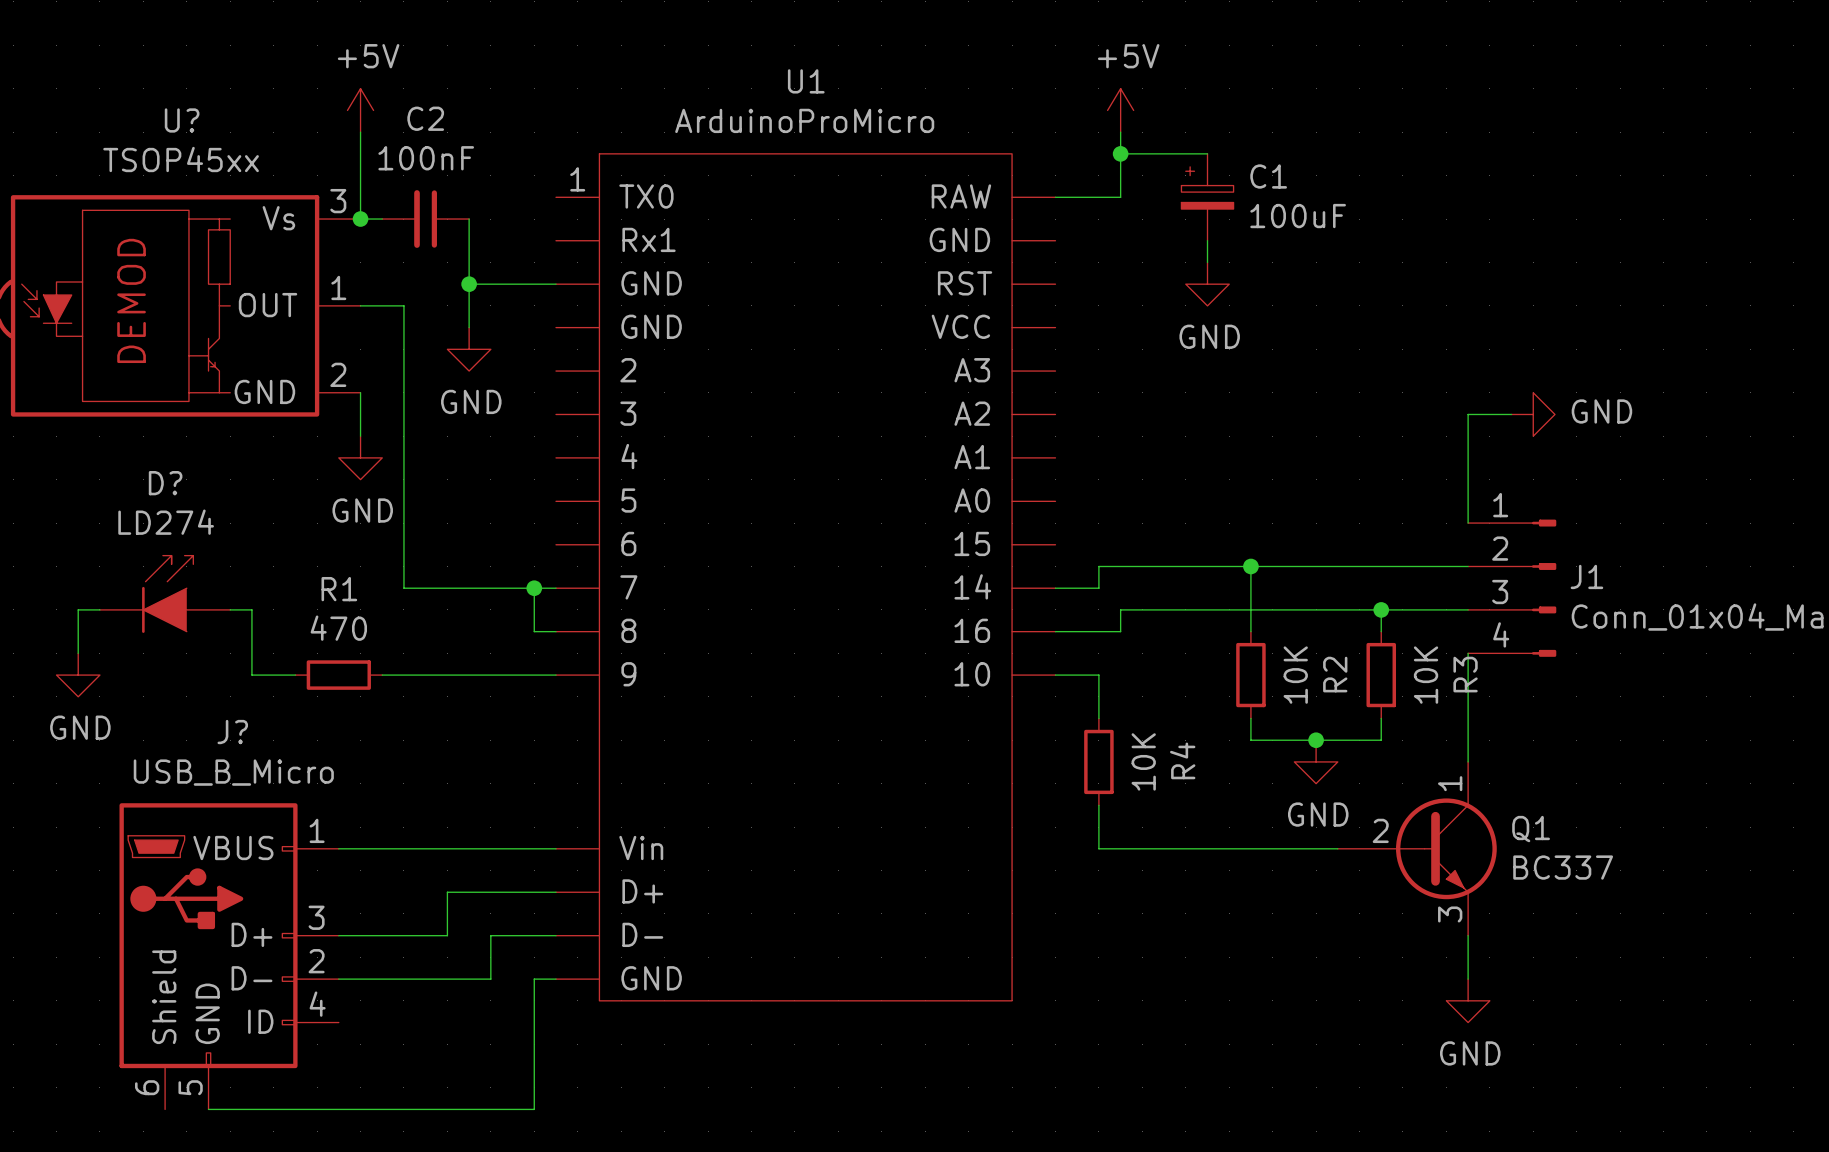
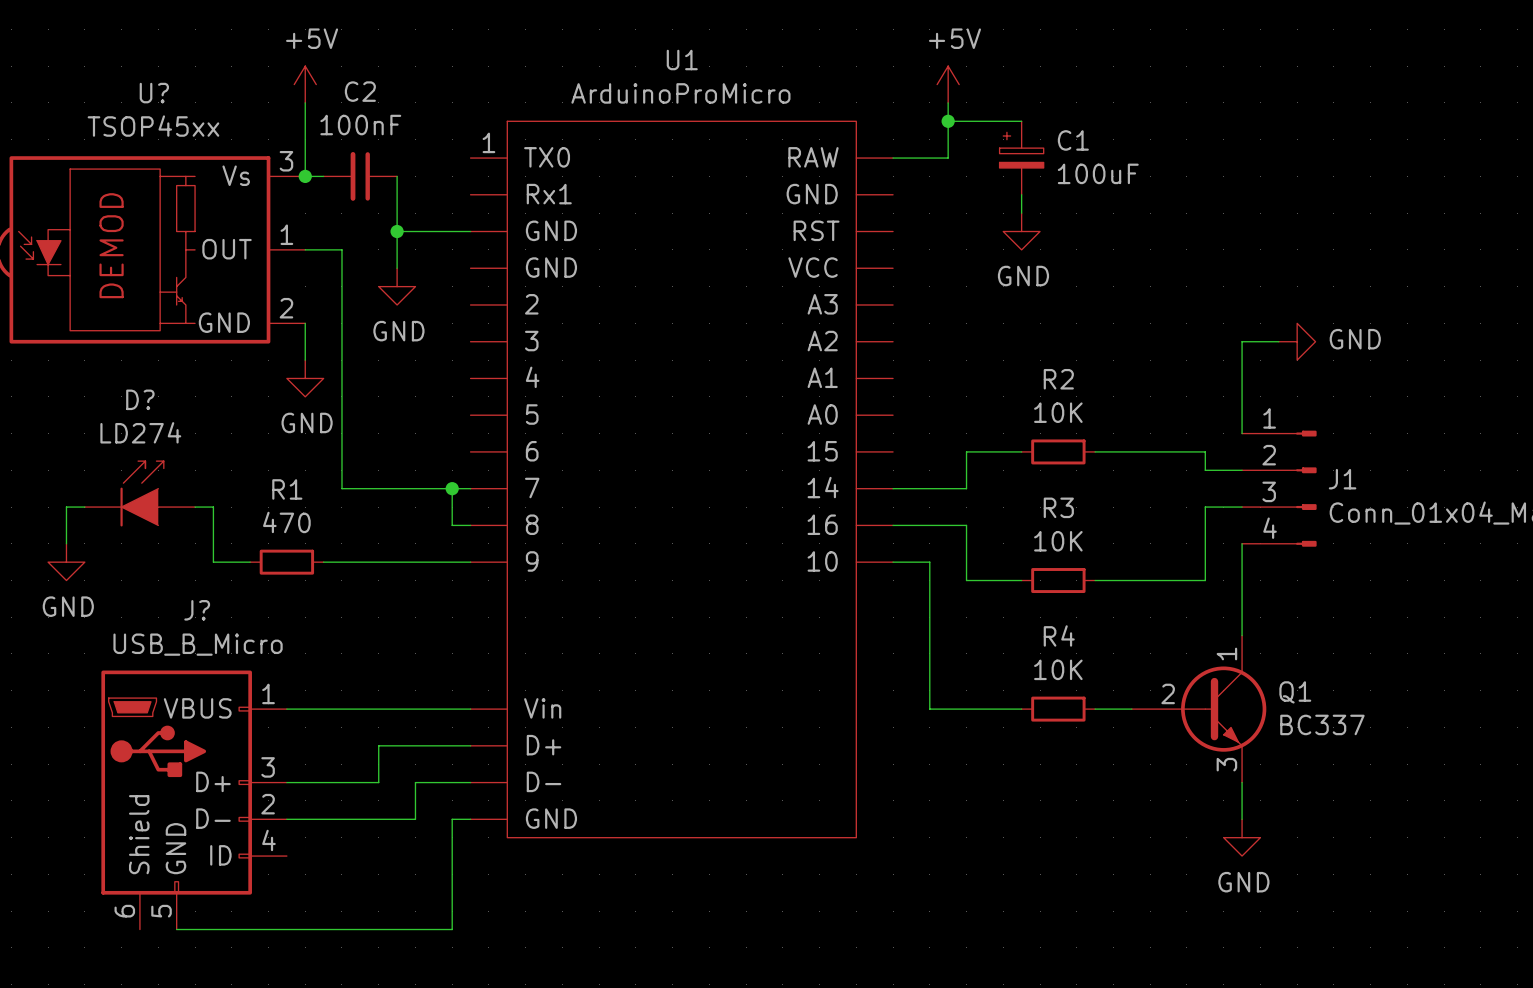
wire: none -> (1021, 451) (966, 451) (966, 488) (929, 488)
wire: (1250, 566) (1250, 631) -> none
junction: (1250, 566) -> none
wire: (1424, 566) (1098, 566) (1098, 588) -> (1205, 470) (1205, 451) (1095, 451)
wire: (1381, 609) (1381, 631) -> none
junction: (1381, 609) -> none
wire: (1424, 609) (1120, 609) (1120, 631) -> (1205, 507) (1205, 580) (1095, 580)
wire: none -> (948, 525) (966, 525) (966, 580) (1021, 580)
R2 name position: R2 (1335, 674) -> R2 (1058, 379)
R3 name position: R3 (1465, 674) -> R3 (1058, 507)
R2 rotation: 0° (1250, 675) -> 90° clockwise (1058, 451)
R2 position: (1250, 675) -> (1058, 451)
R2 value position: 10K (1295, 675) -> 10K (1058, 412)
R3 rotation: 0° (1381, 675) -> 90° clockwise (1058, 580)
R3 position: (1381, 675) -> (1058, 580)
R3 value position: 10K (1426, 675) -> 10K (1058, 541)
wire: none -> (929, 598) (929, 672)
wire: (1250, 718) (1250, 740) (1381, 740) (1381, 718) -> none
junction: (1316, 740) -> none
R4 name position: R4 (1182, 760) -> R4 (1059, 635)
R4 rotation: 0° (1098, 761) -> 90° clockwise (1058, 709)
R4 position: (1098, 761) -> (1058, 709)
R4 value position: 10K (1143, 761) -> 10K (1058, 669)
power symbol: GND (1316, 761) -> none
wire: (1207, 848) (1294, 848) -> none

